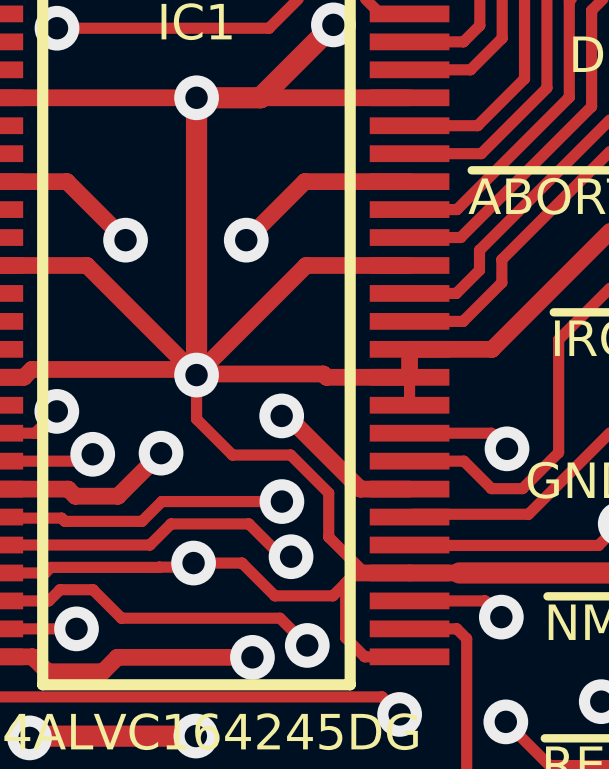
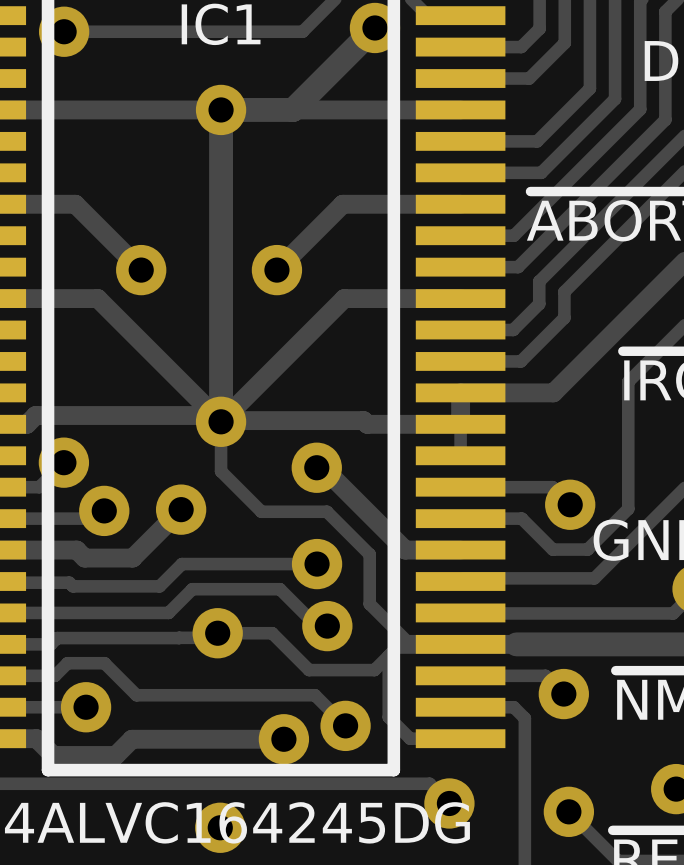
track: (195, 736) (31, 736) (29, 737) -> none
via: (29, 737) -> none

